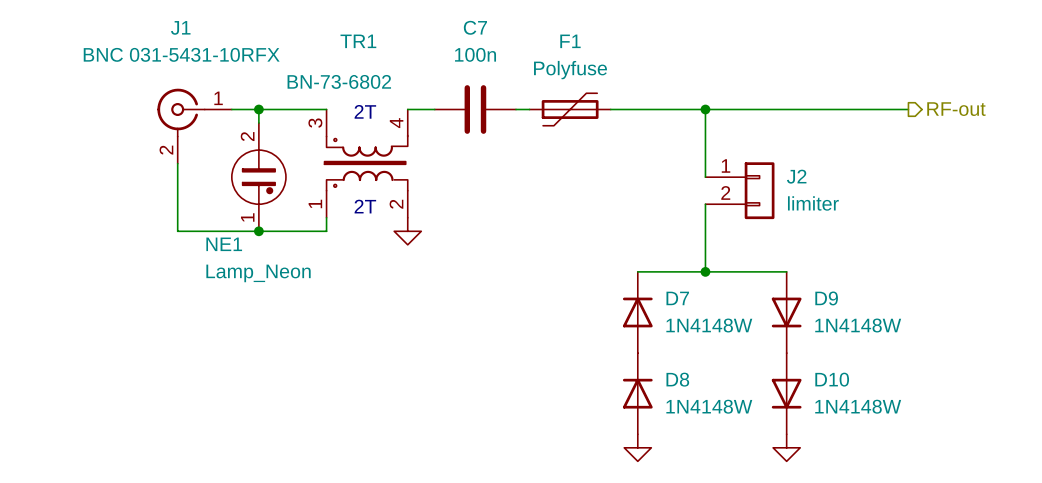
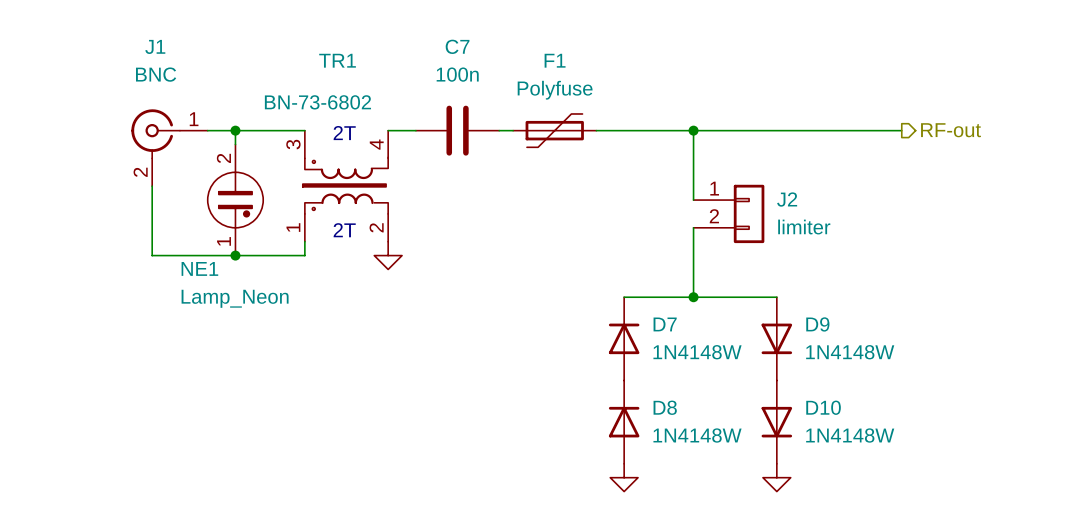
J1 value: BNC 031-5431-10RFX (181, 54) -> BNC (156, 74)

